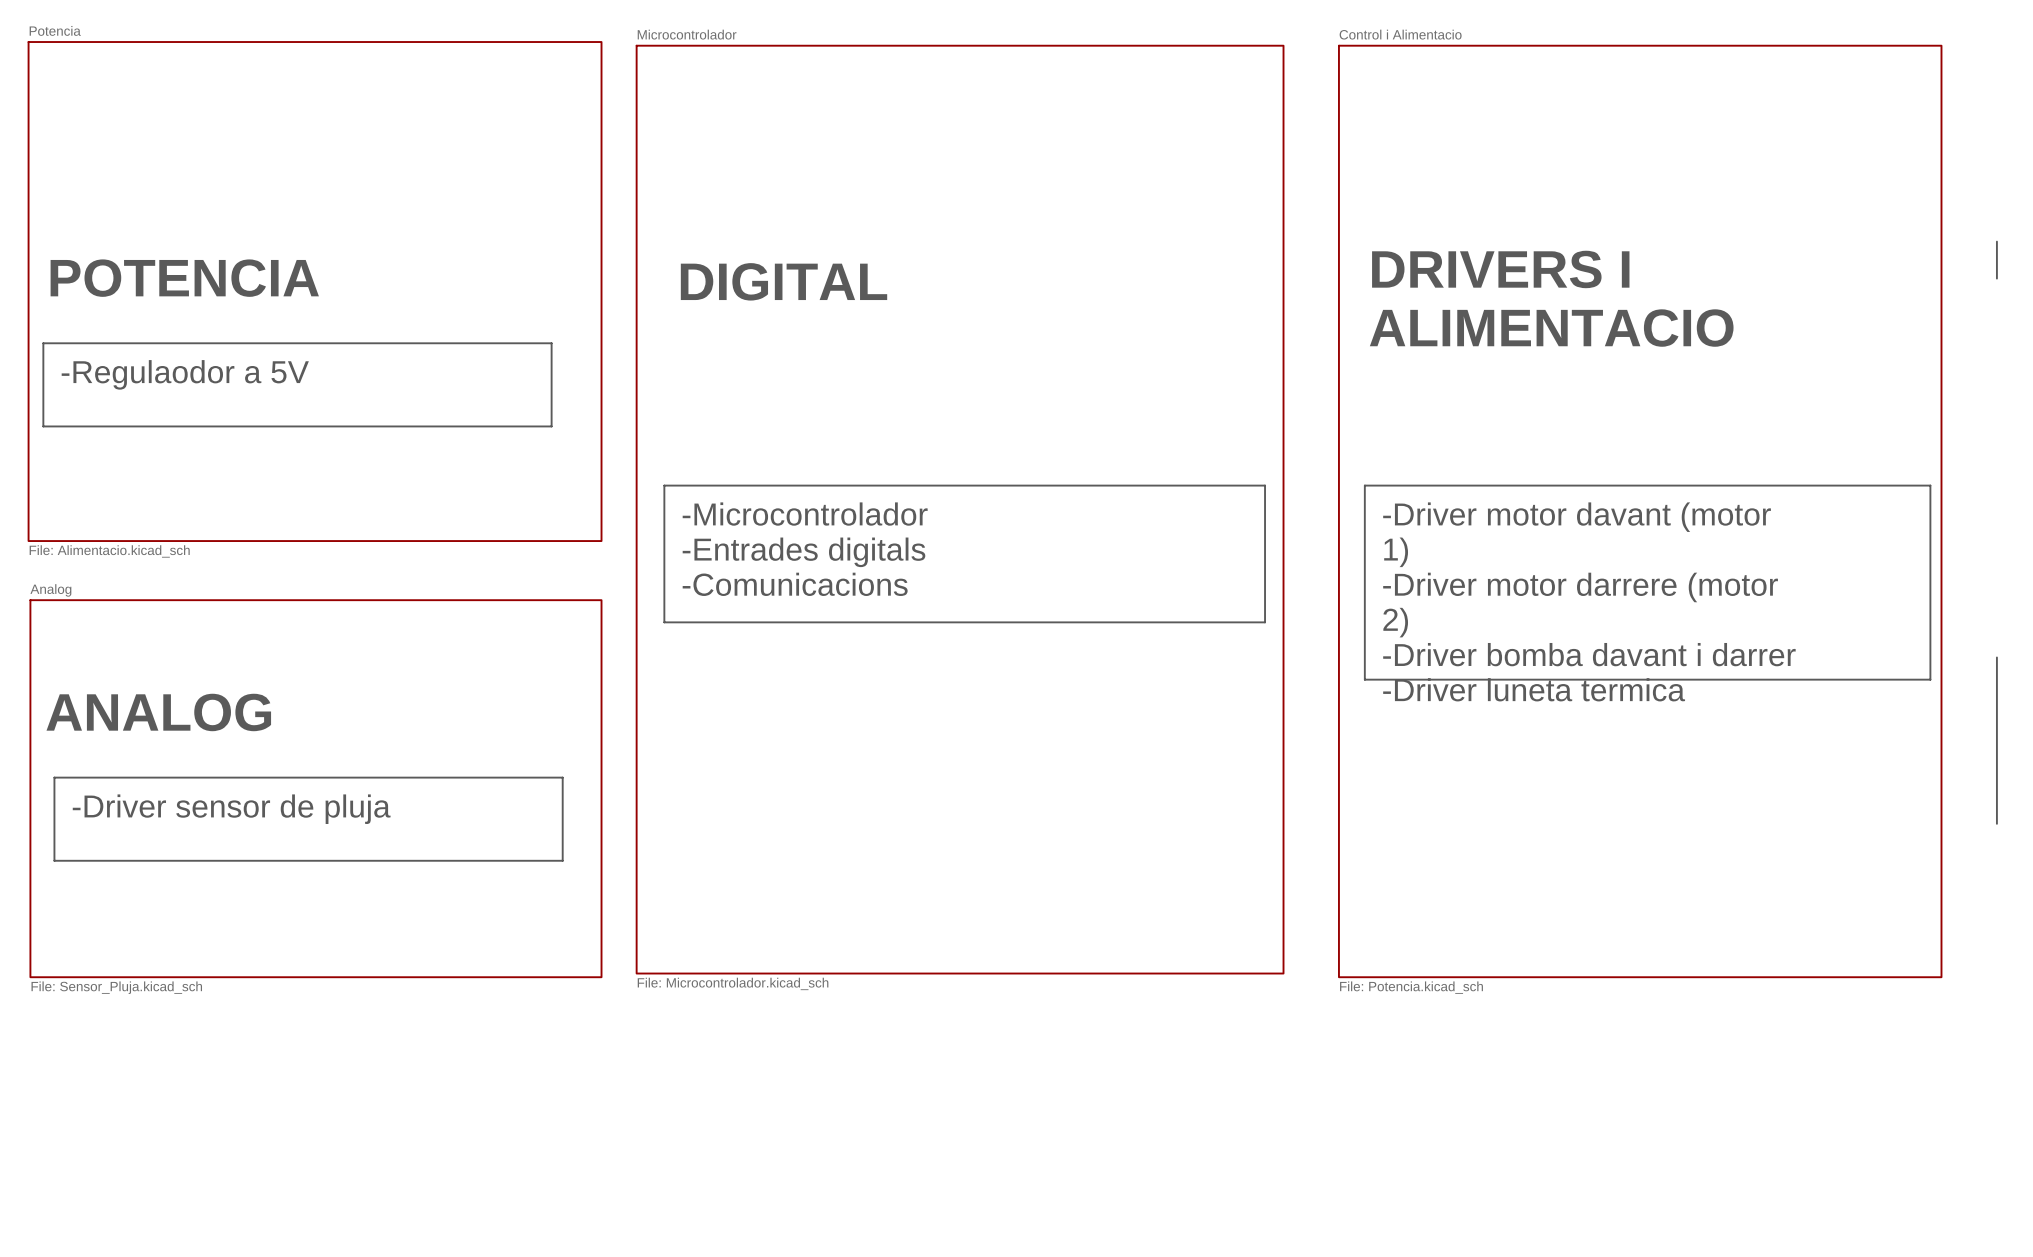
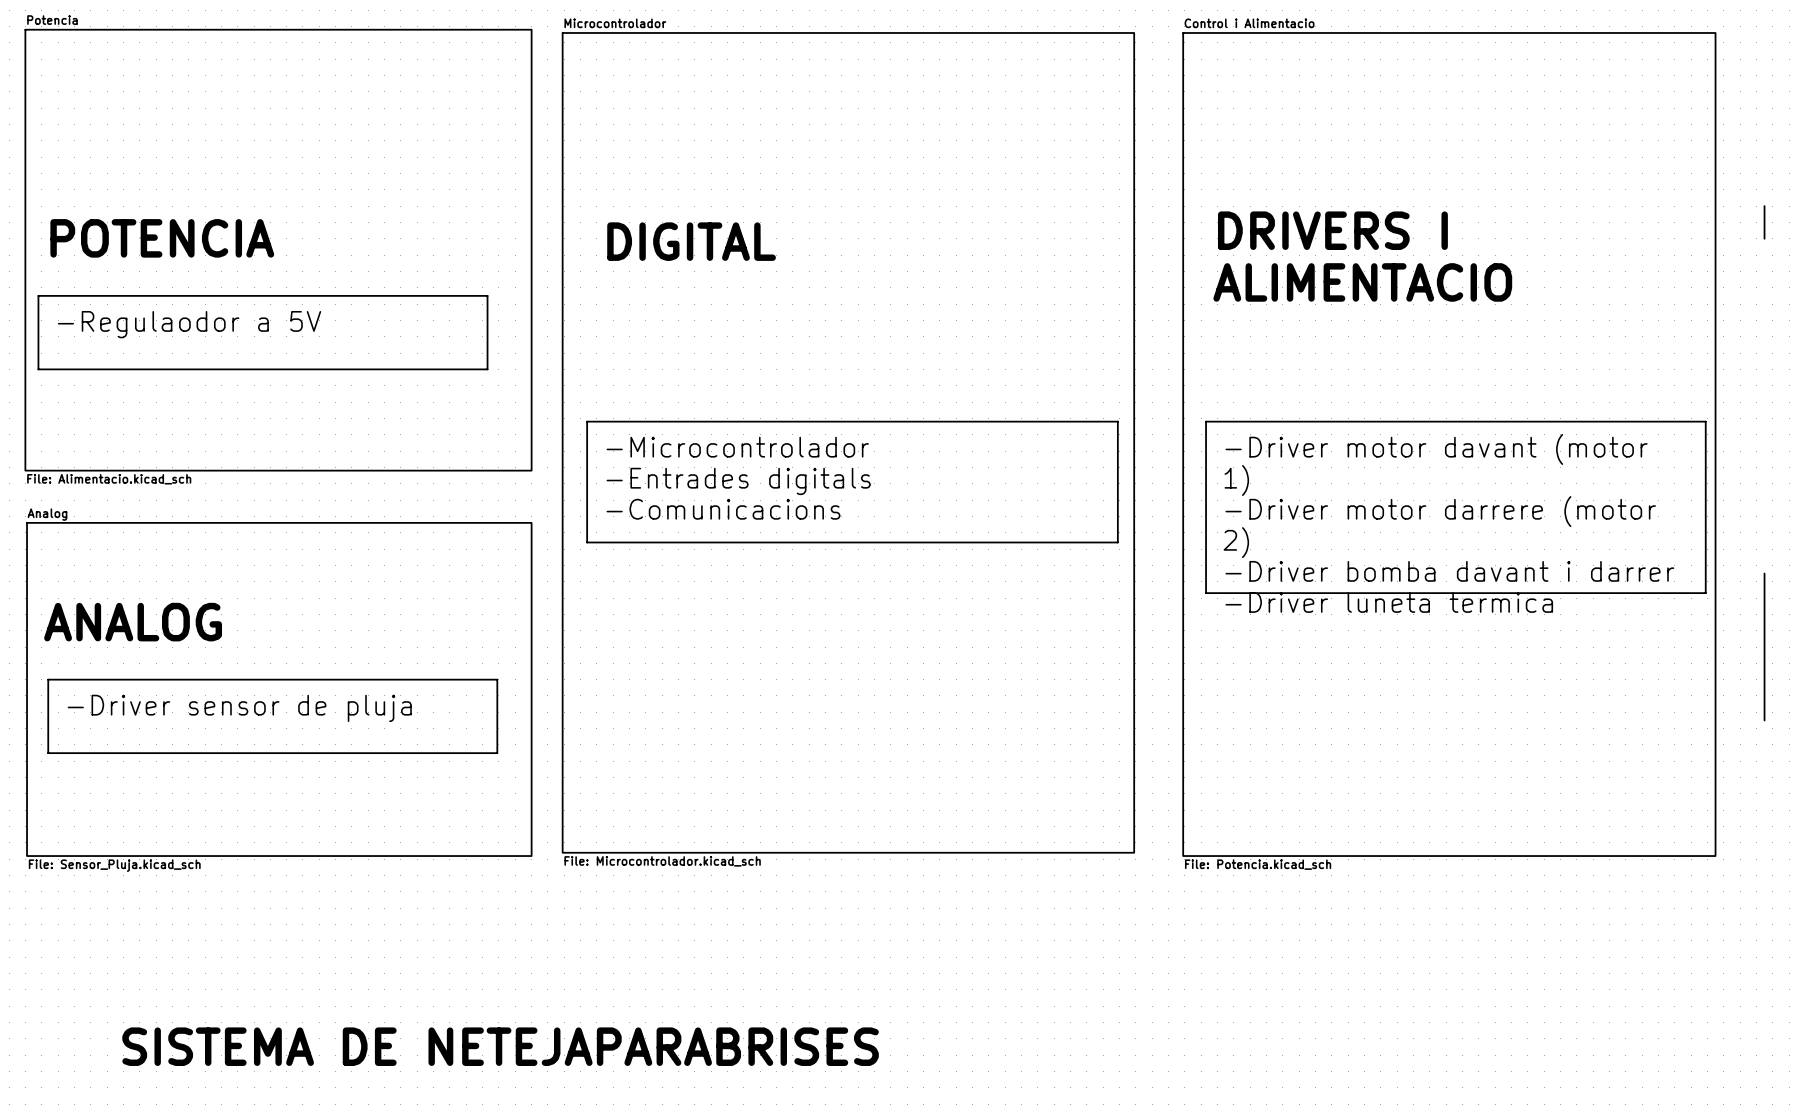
text: none -> SISTEMA DE NETEJAPARABRISES (500, 1046)

